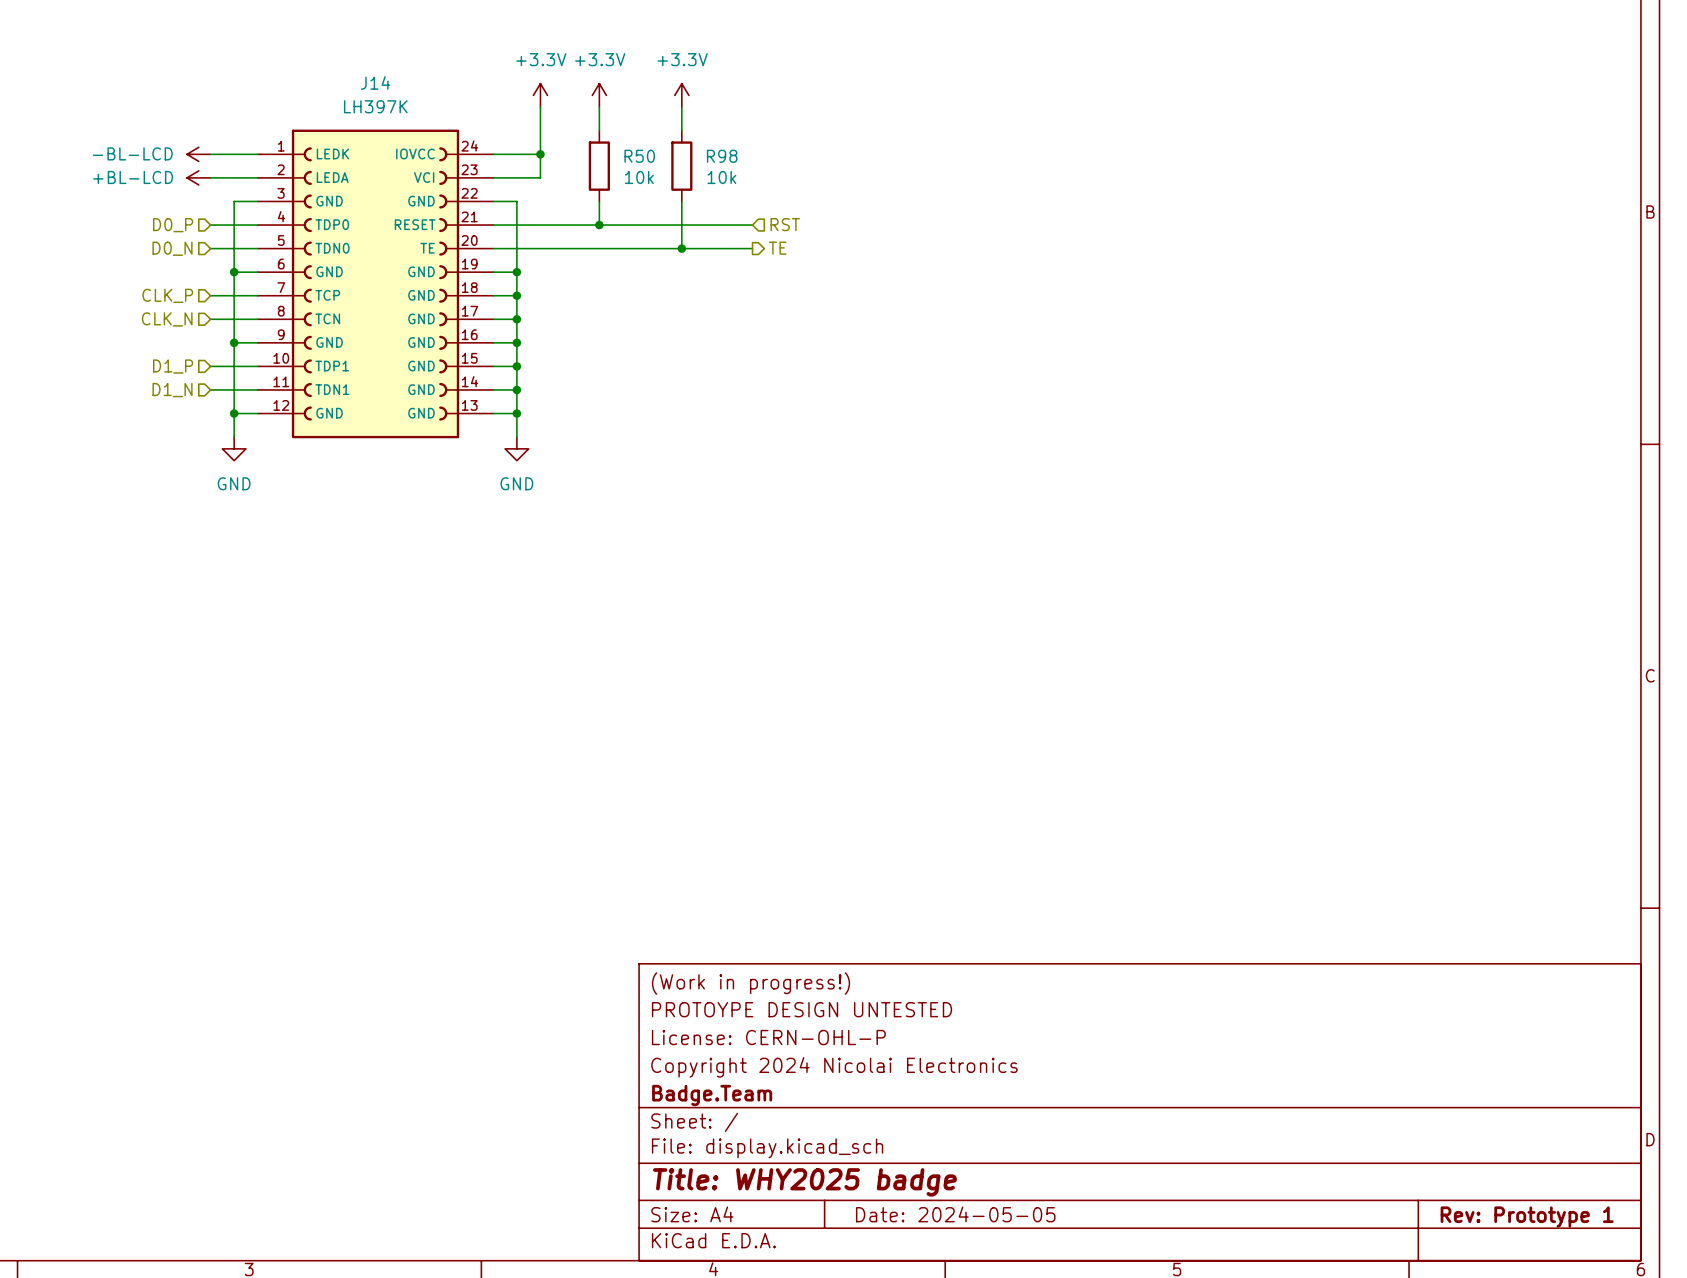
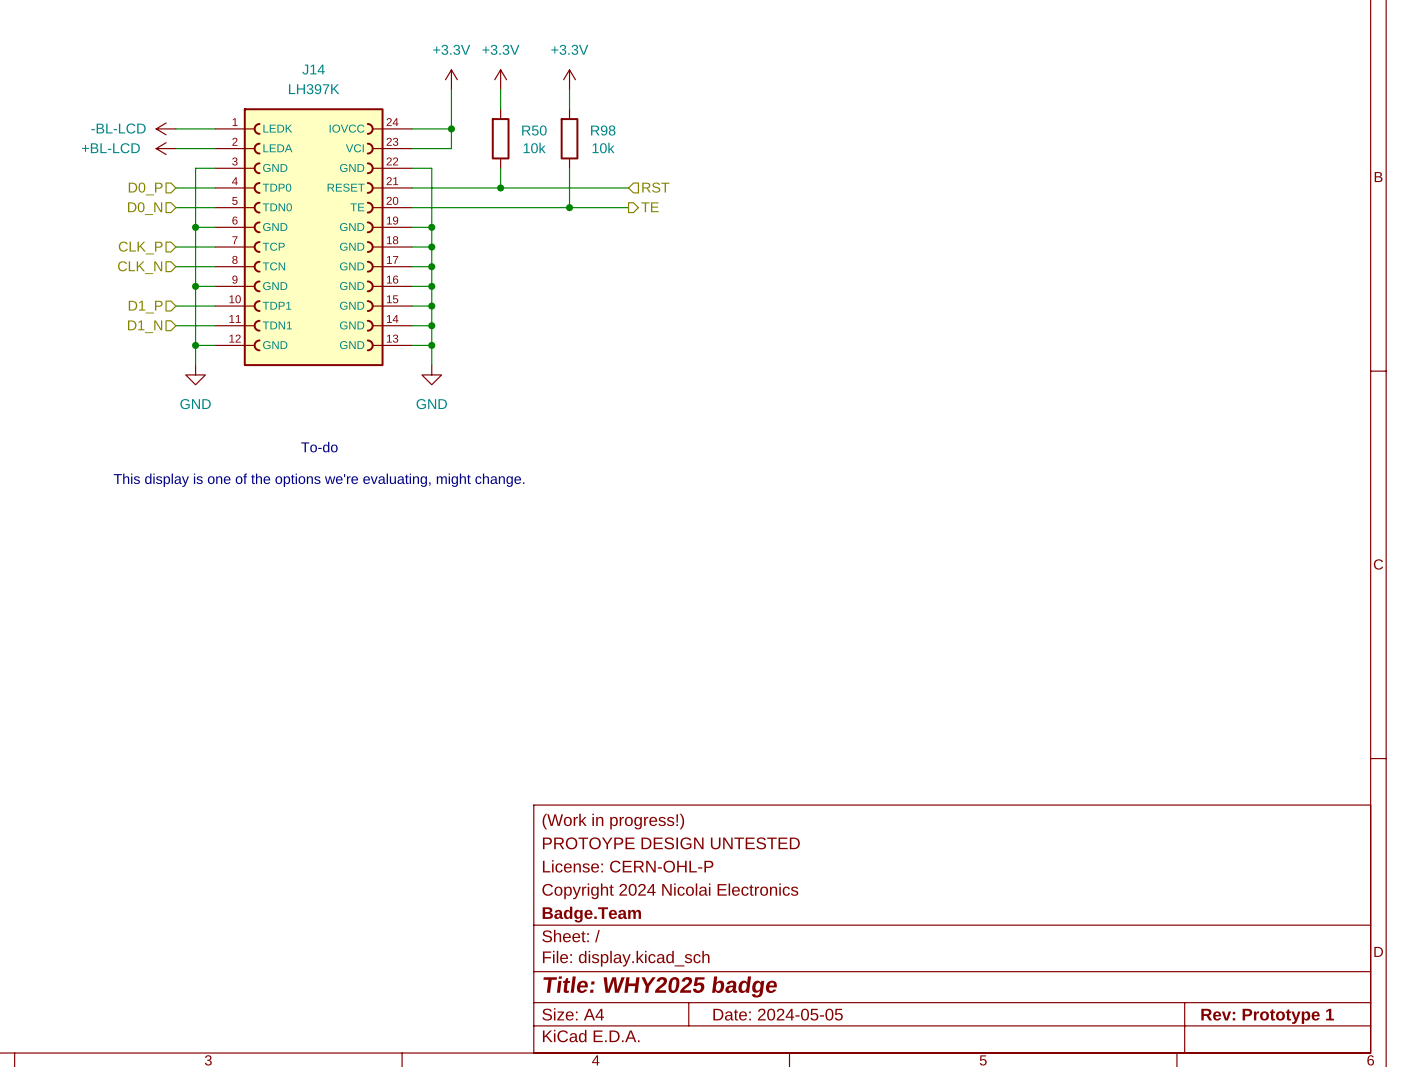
text: none -> To-do (319, 447)
text: none -> This display is one of the options we're evaluating, might change. (319, 480)

